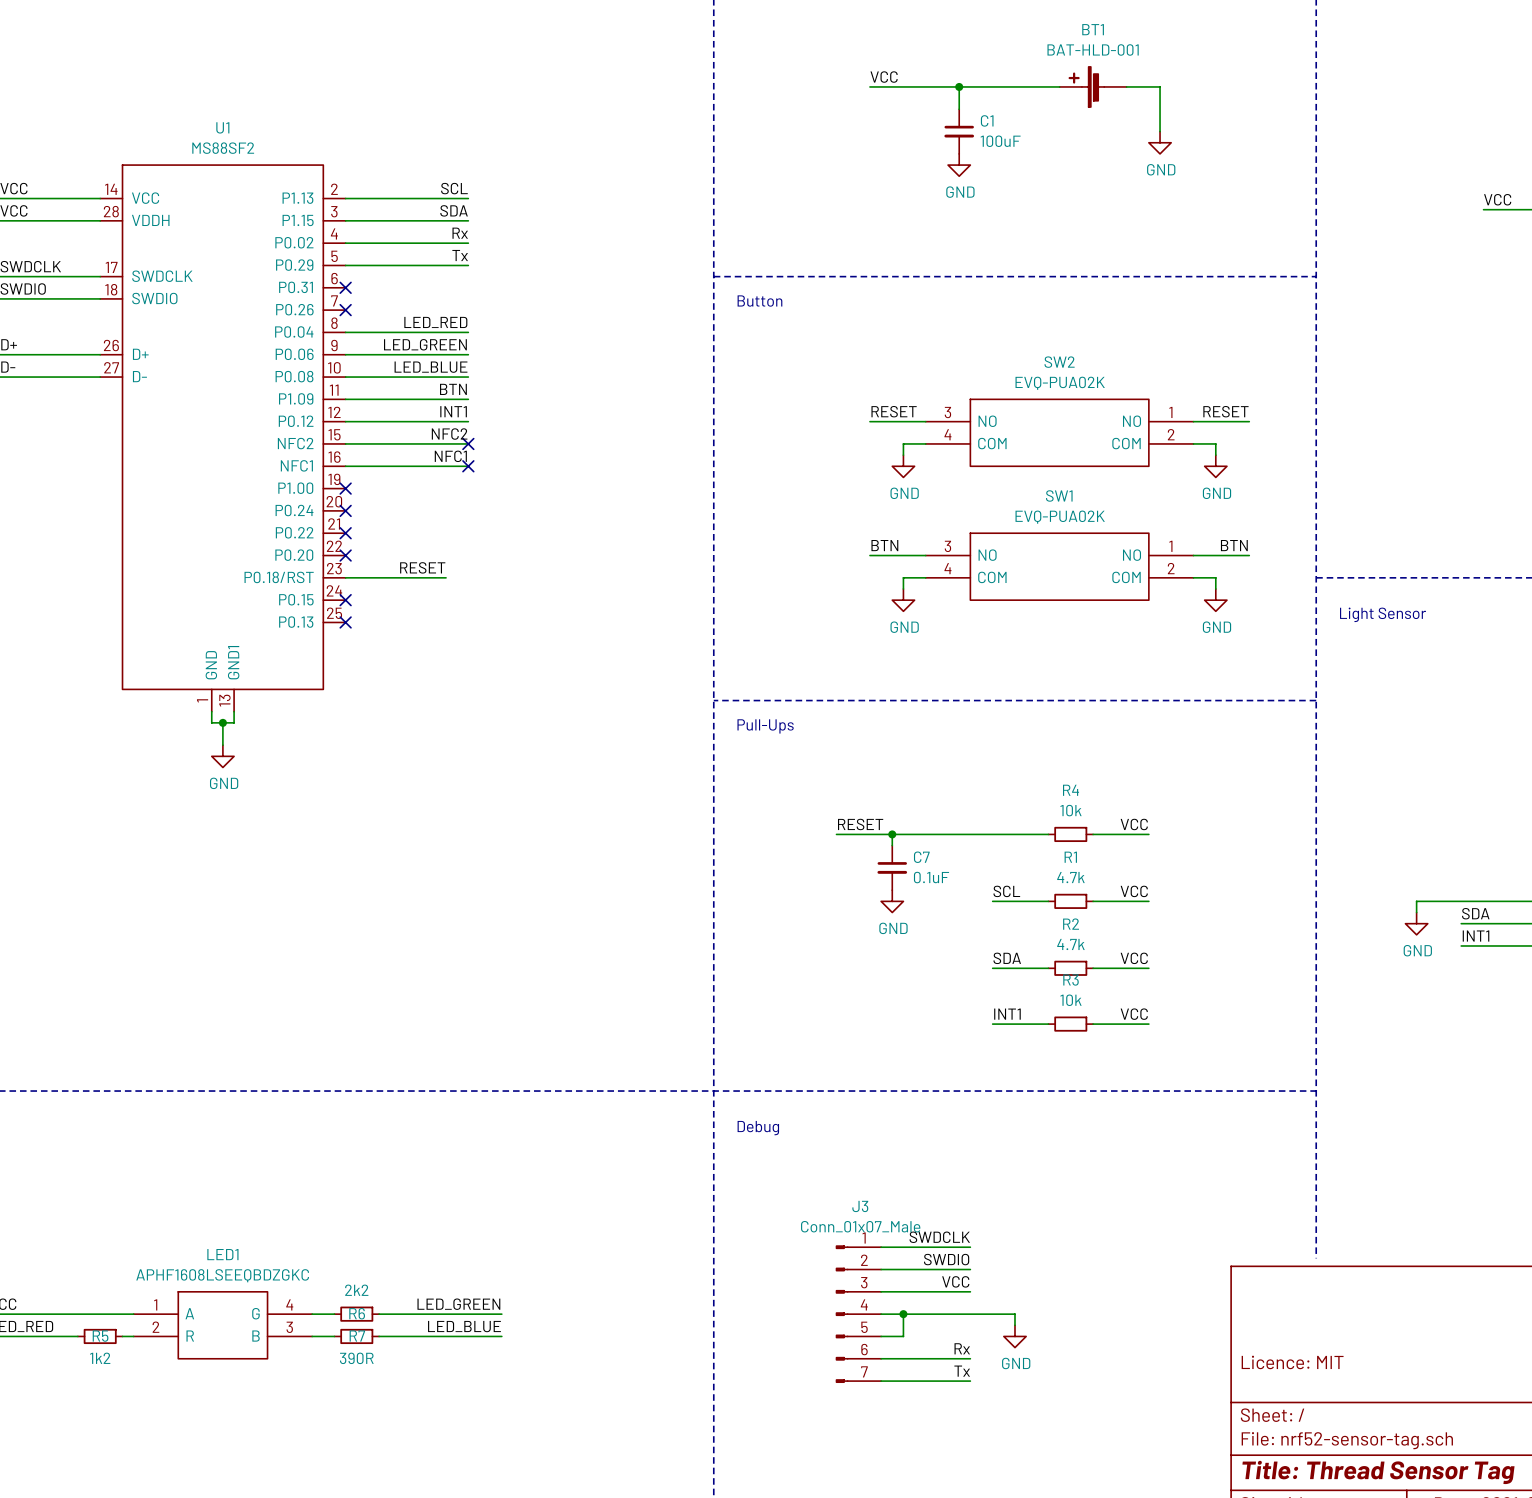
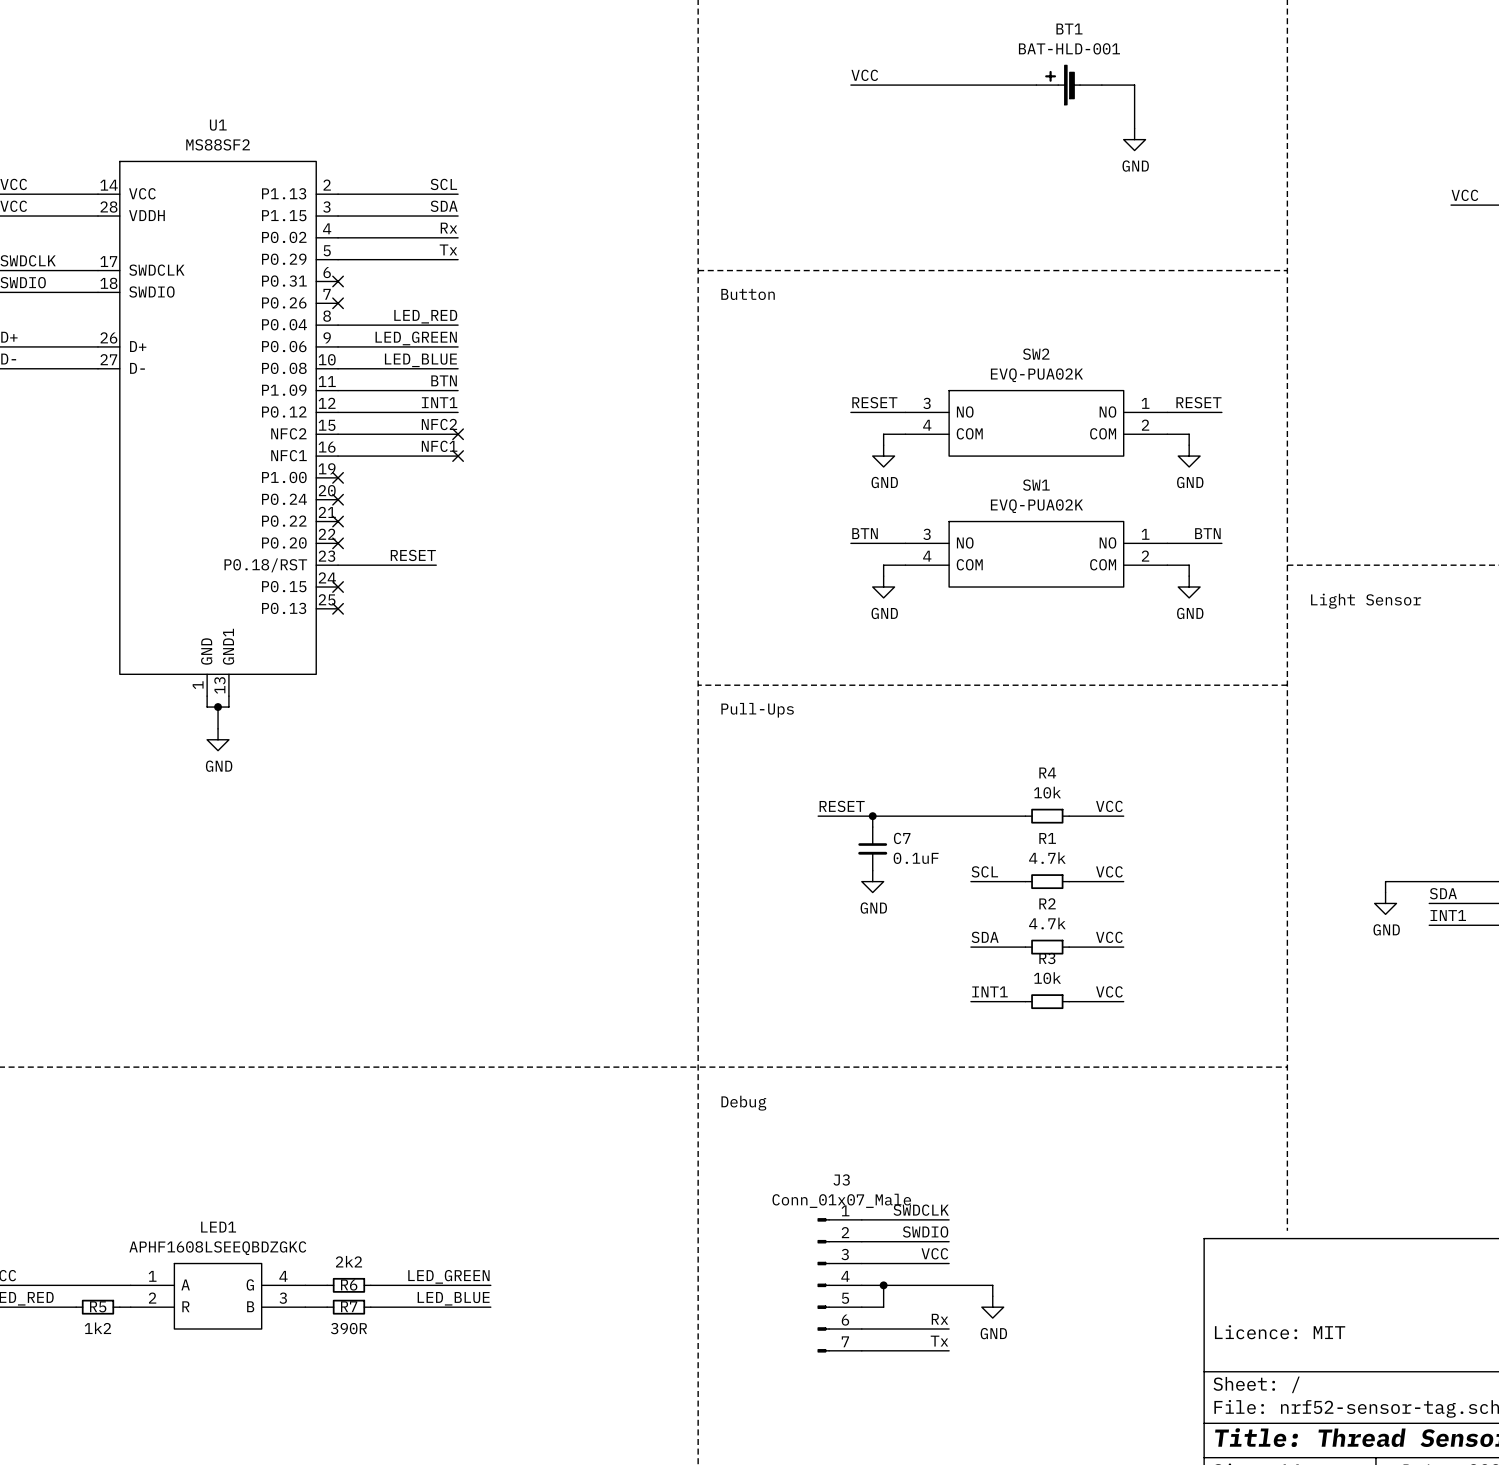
wire: (959, 86) (959, 109) -> none
junction: (959, 86) -> none
C1: 100uF (959, 131) -> none
power symbol: GND (959, 165) -> none

